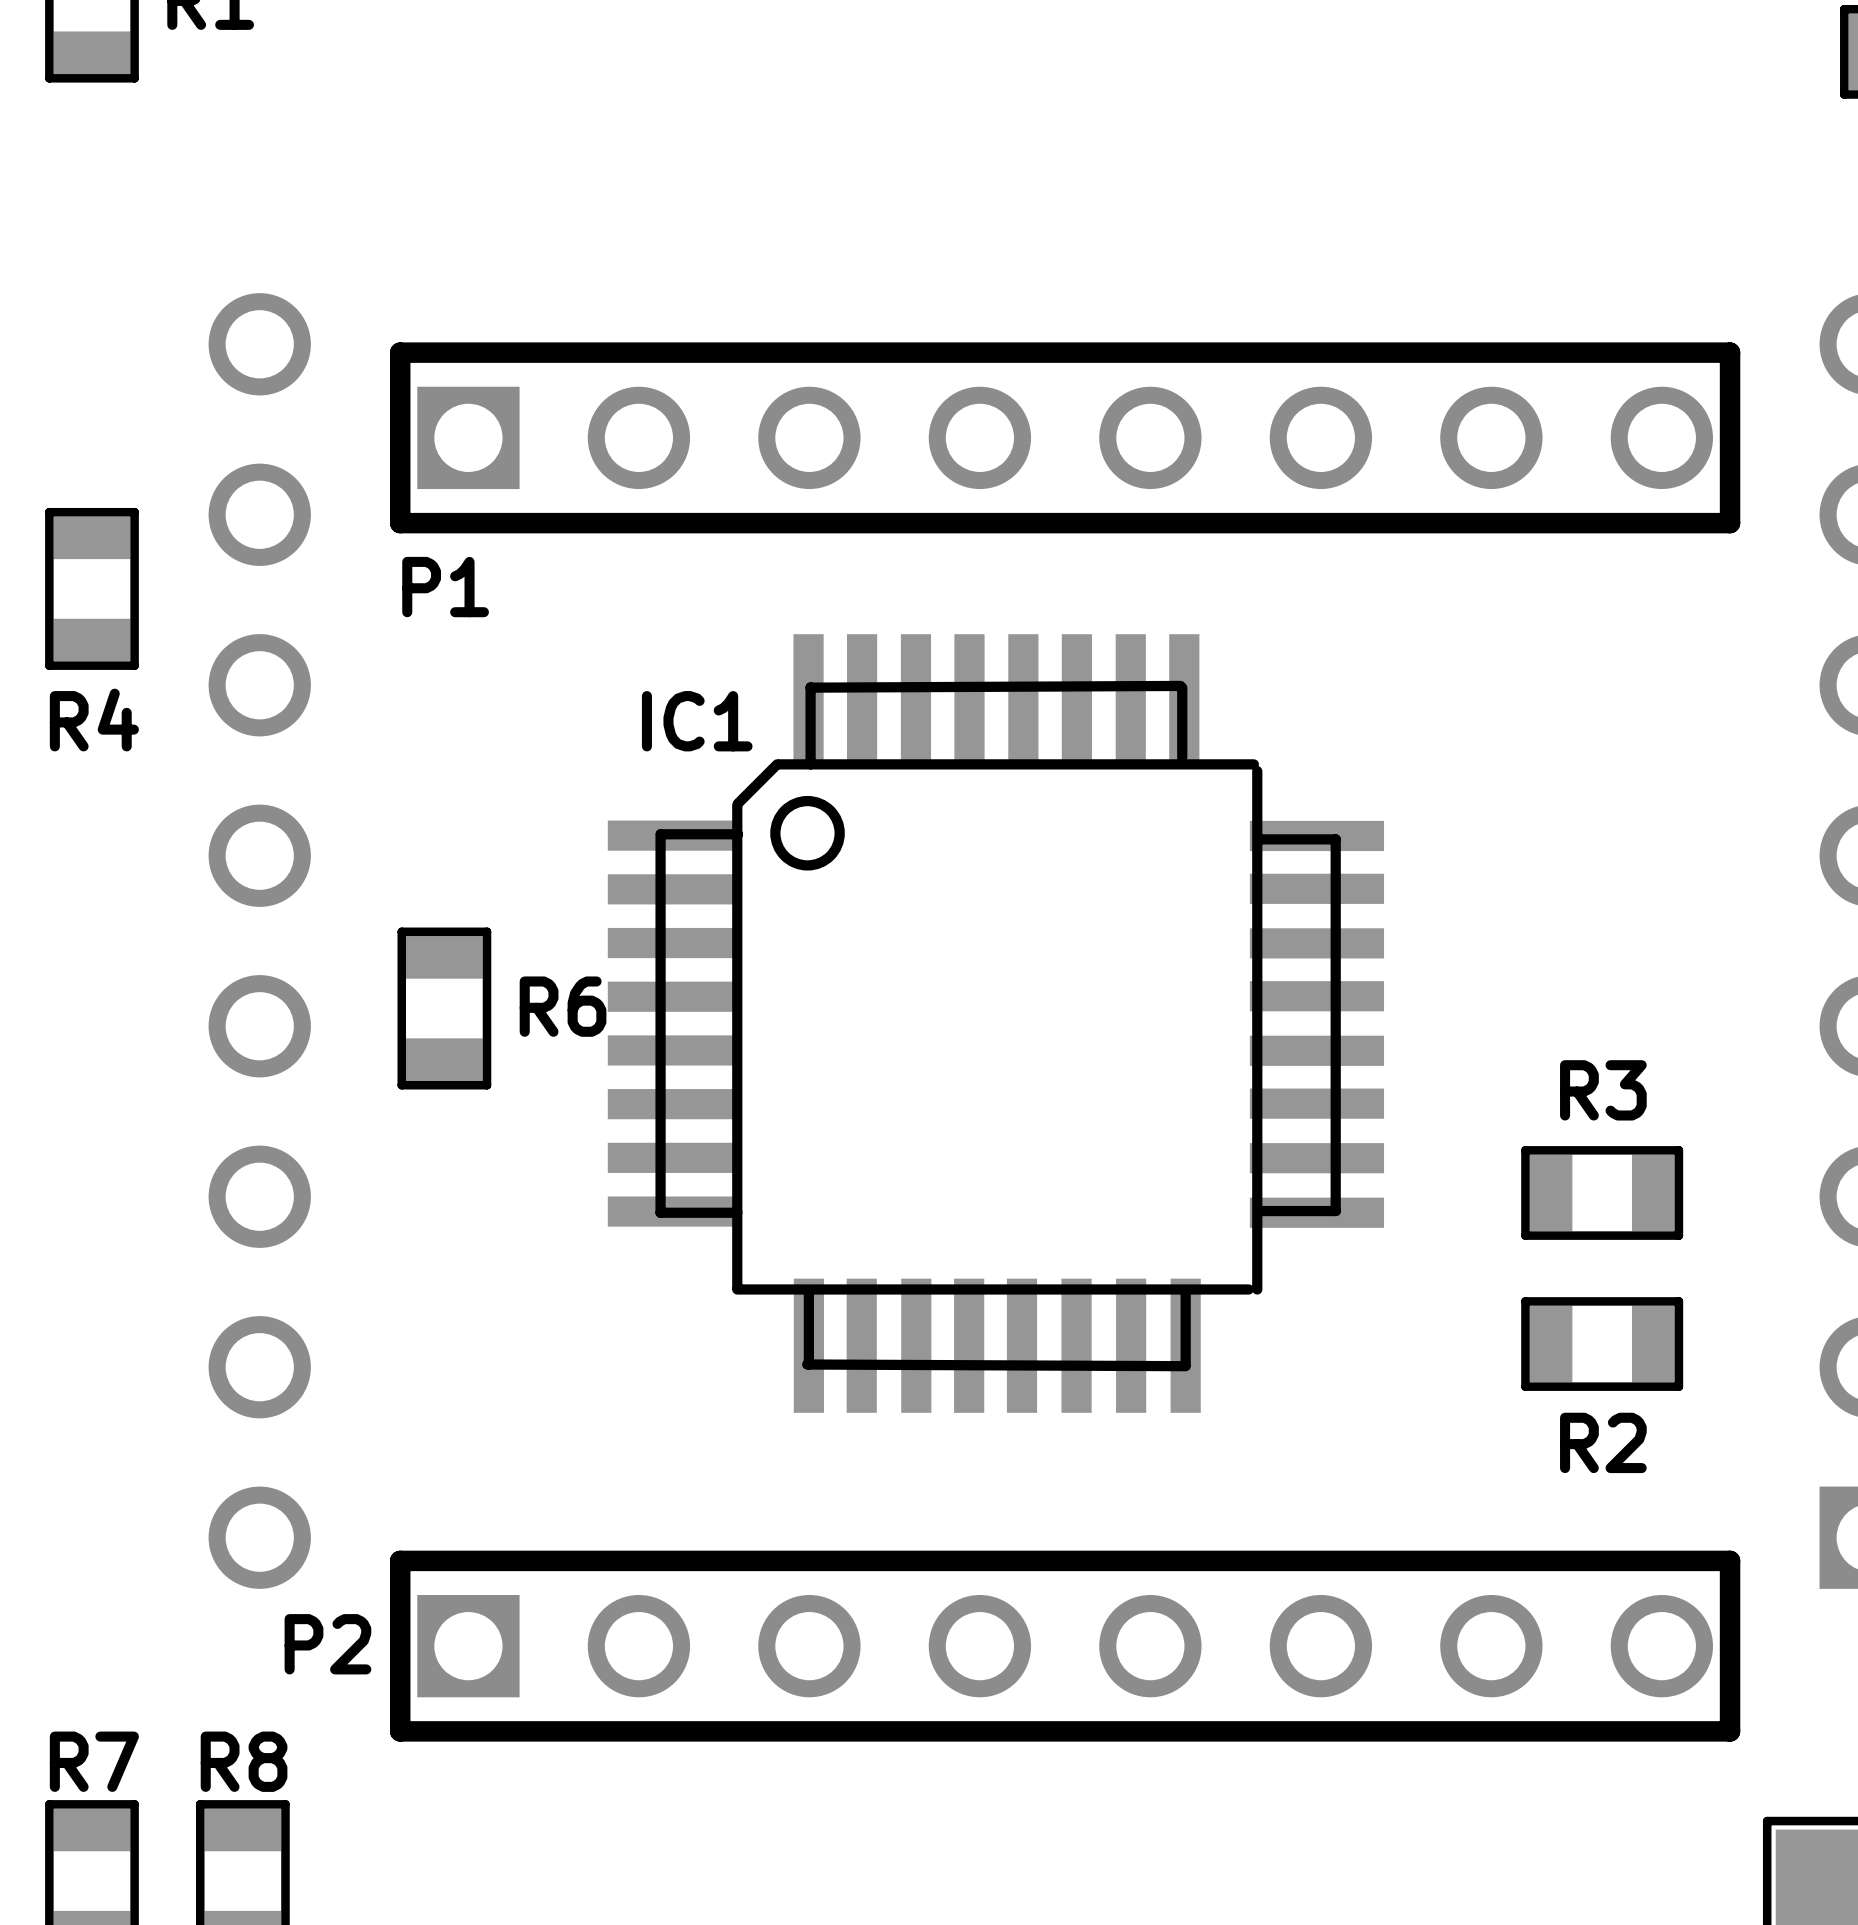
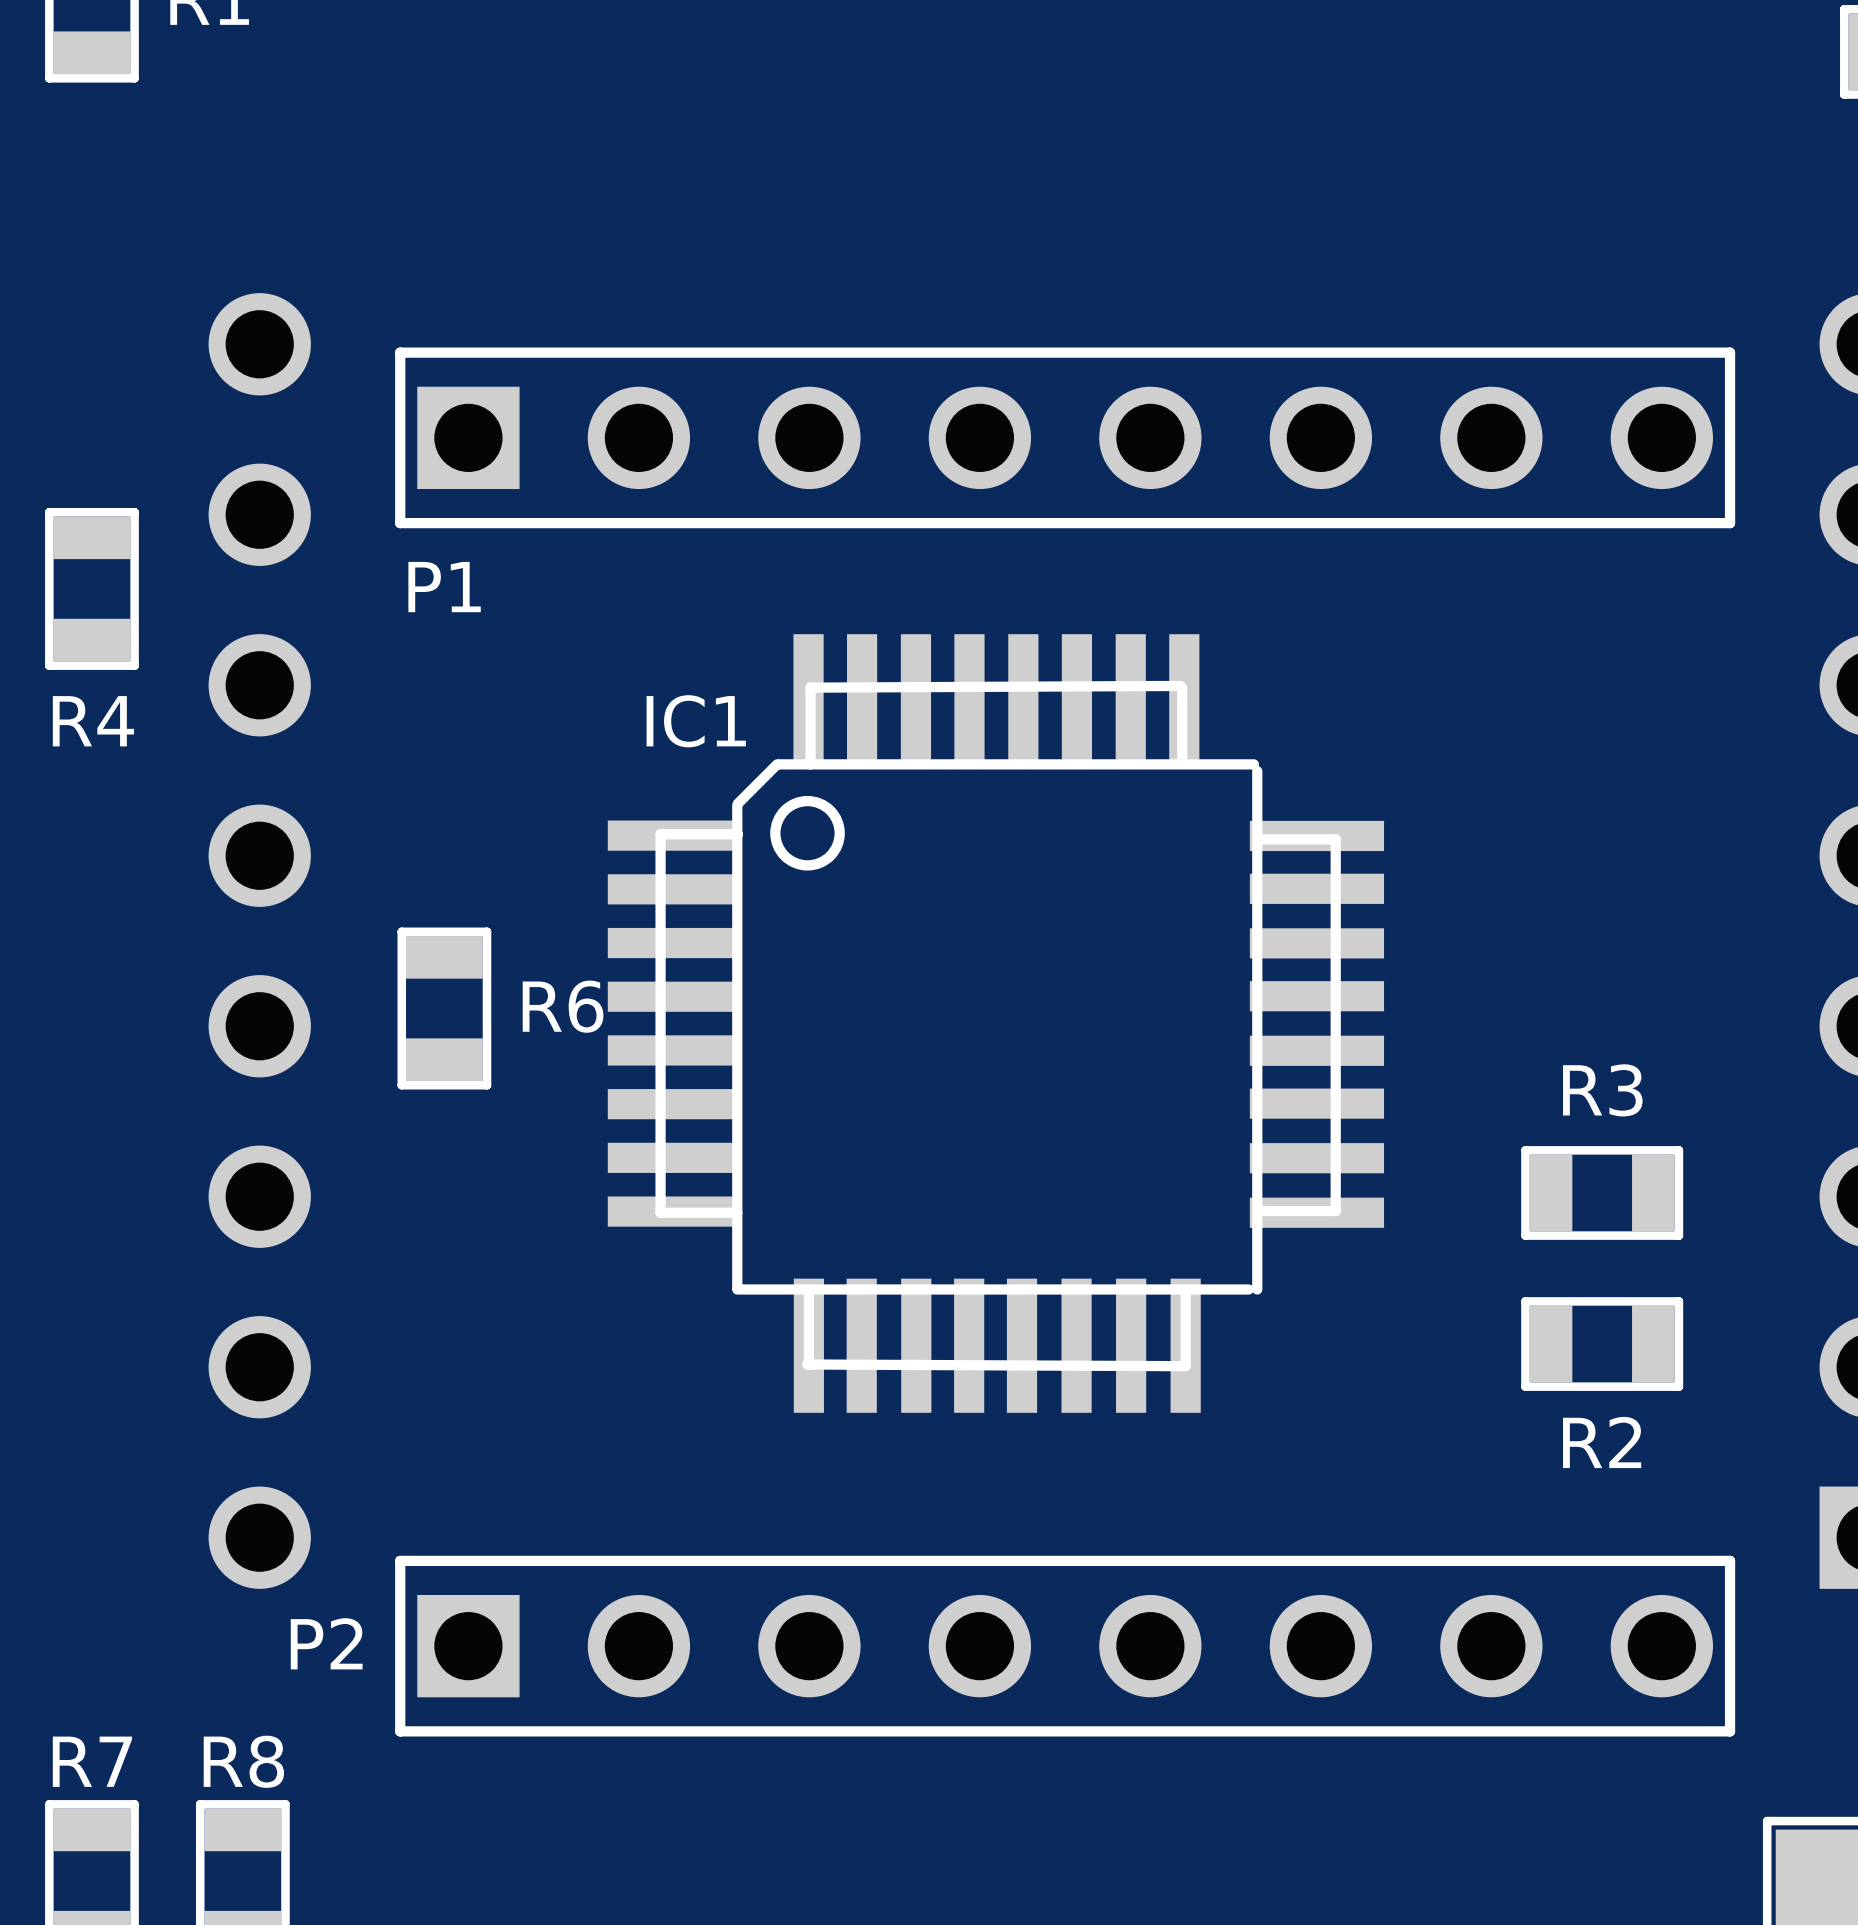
P1 footprint: [390, 342, 1741, 534] -> [395, 347, 1736, 529]
P2 footprint: [390, 1550, 1741, 1742] -> [395, 1555, 1736, 1737]

